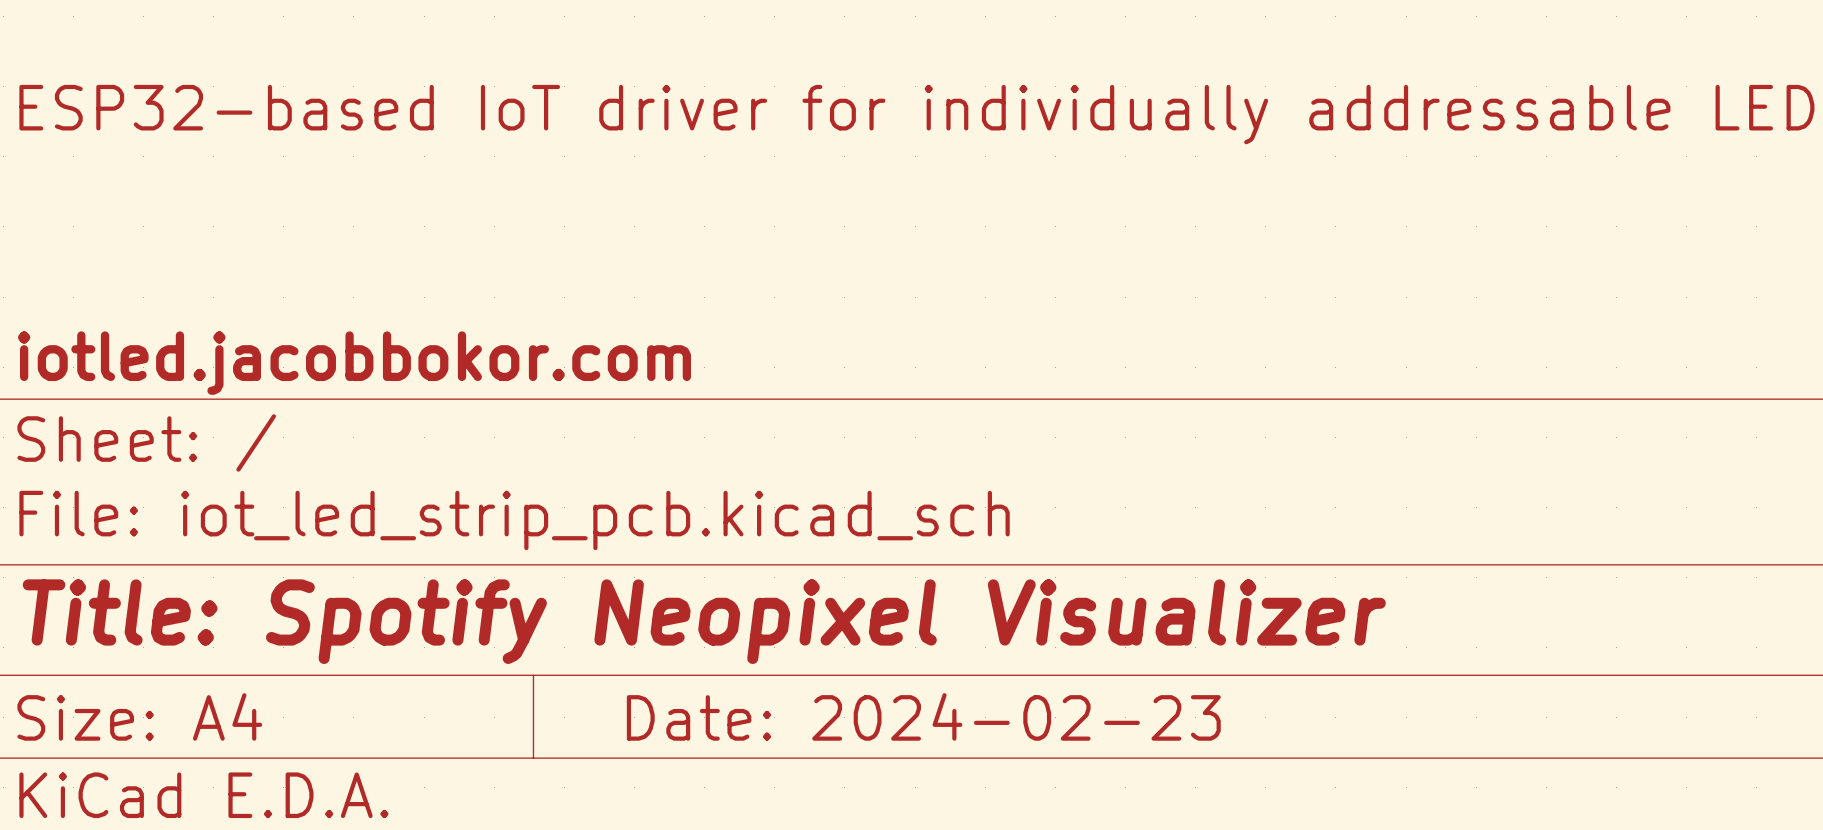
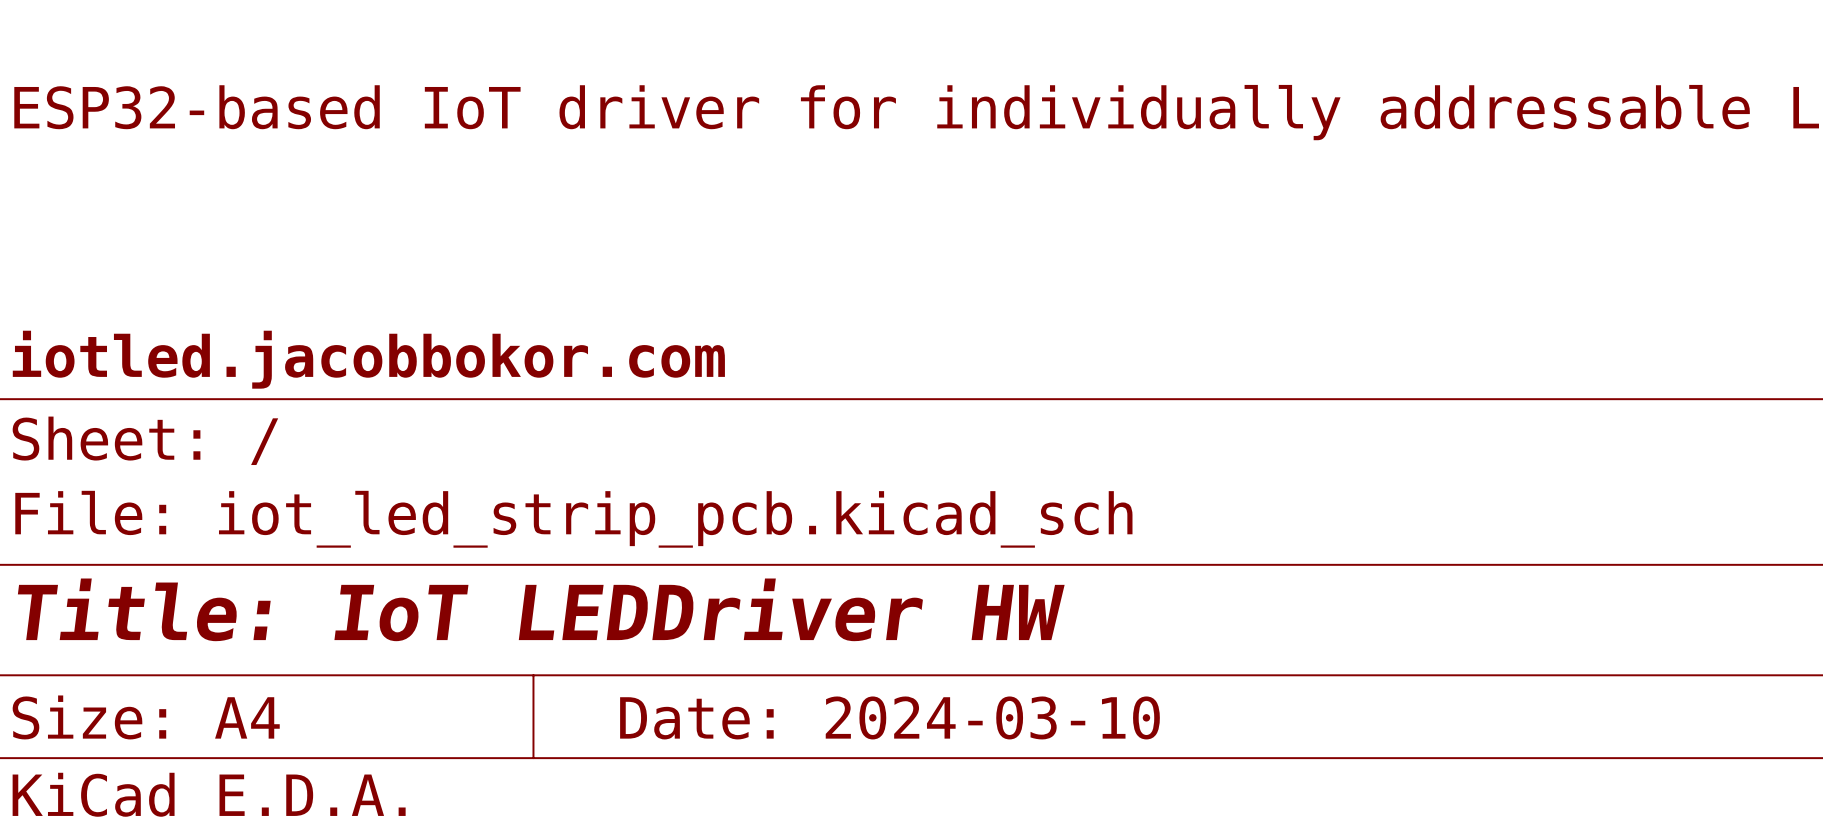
title block: Title: Spotify Neopixel Visualizer (704, 621) -> Title: IoT LEDDriver HW (541, 609)
title block: Date: 2024-02-23 (923, 716) -> Date: 2024-03-10 (889, 717)

